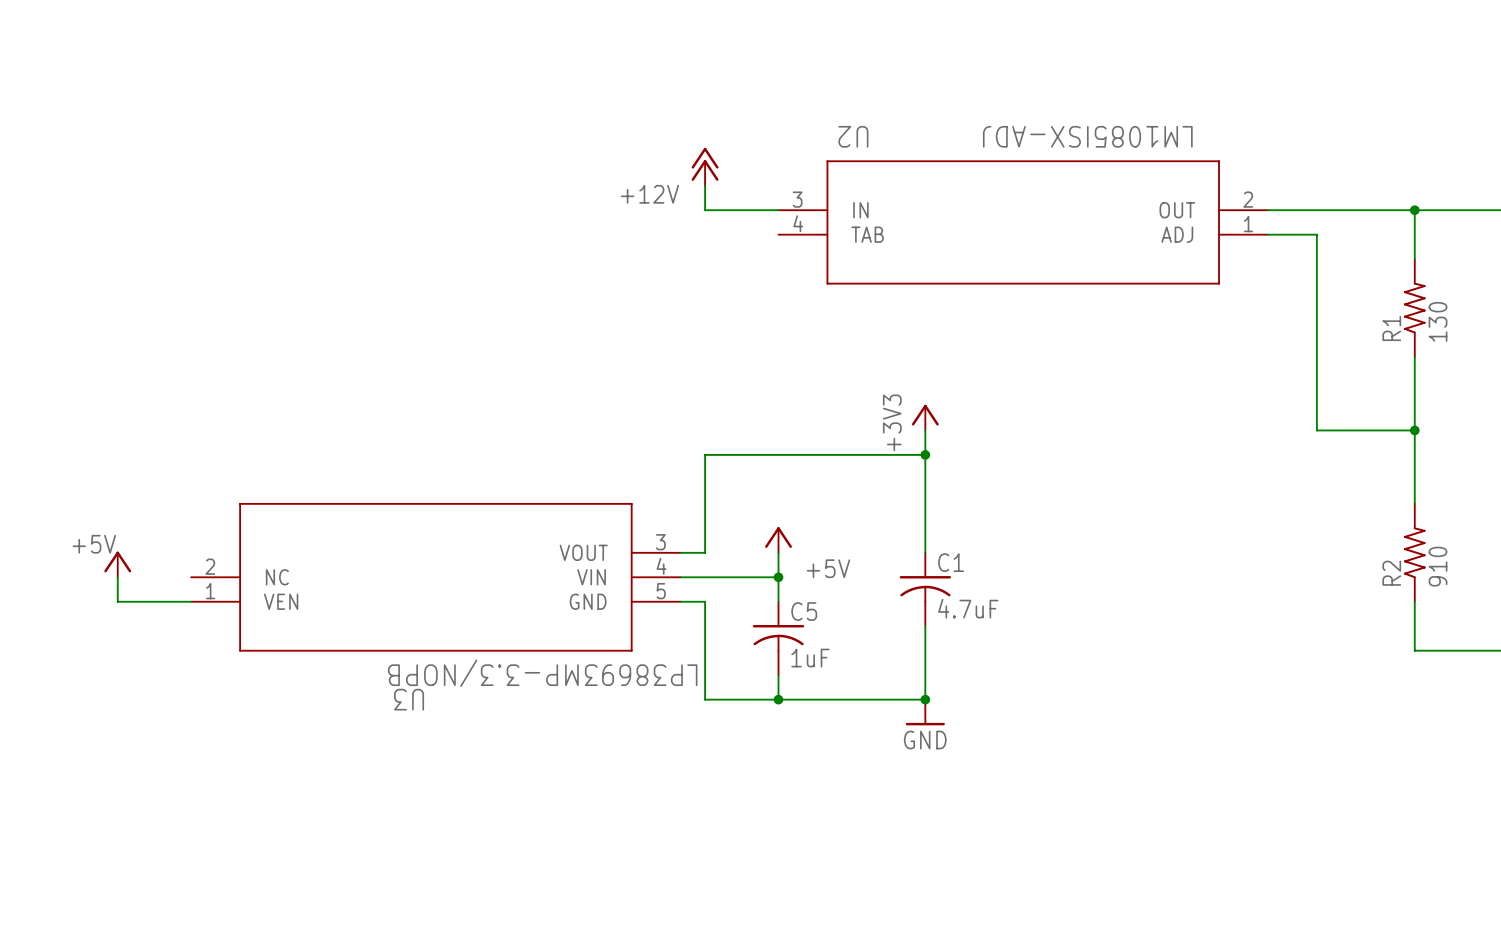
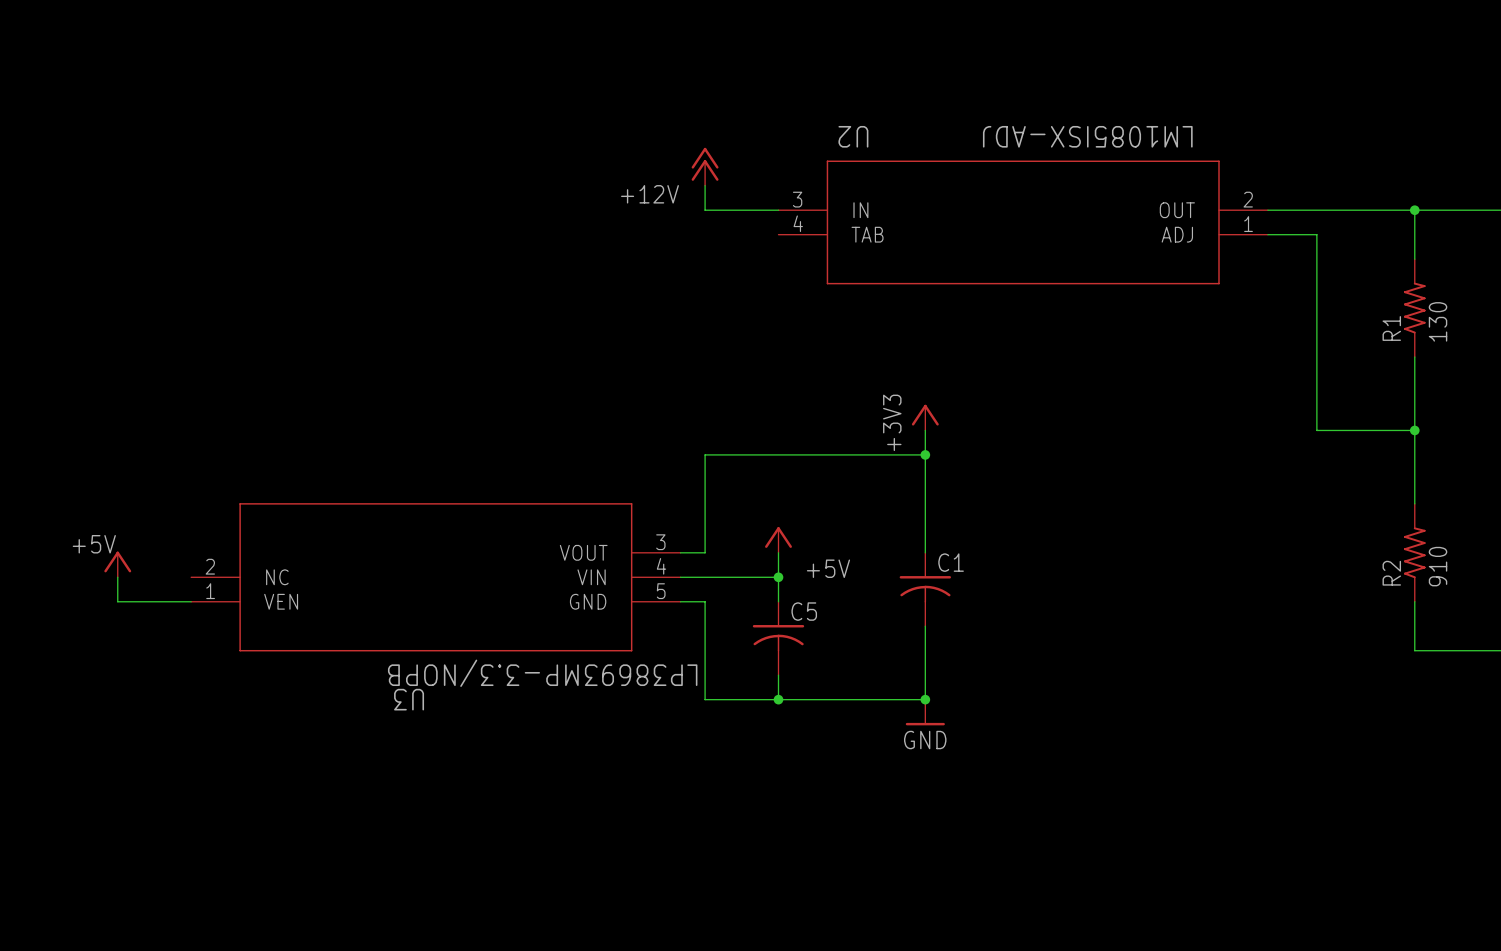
C1 value: 4.7uF (968, 608) -> none
C5 value: 1uF (810, 658) -> none

